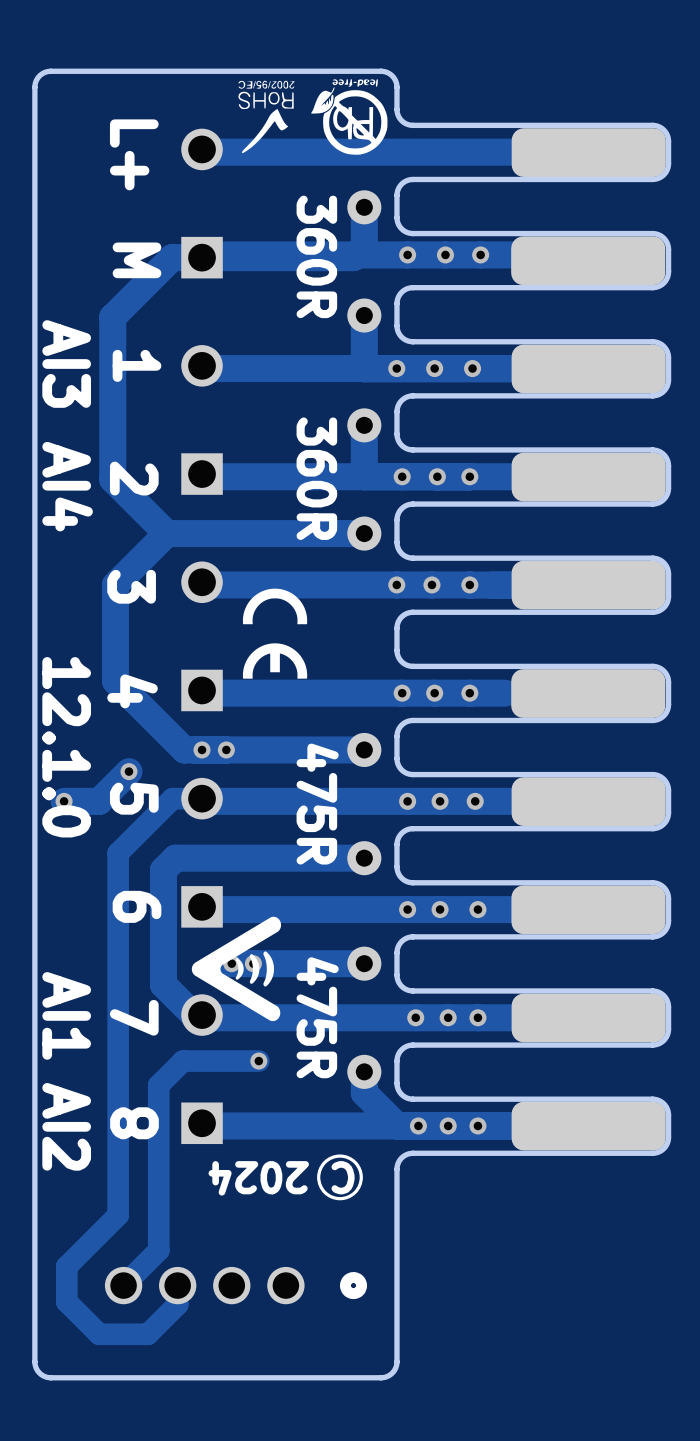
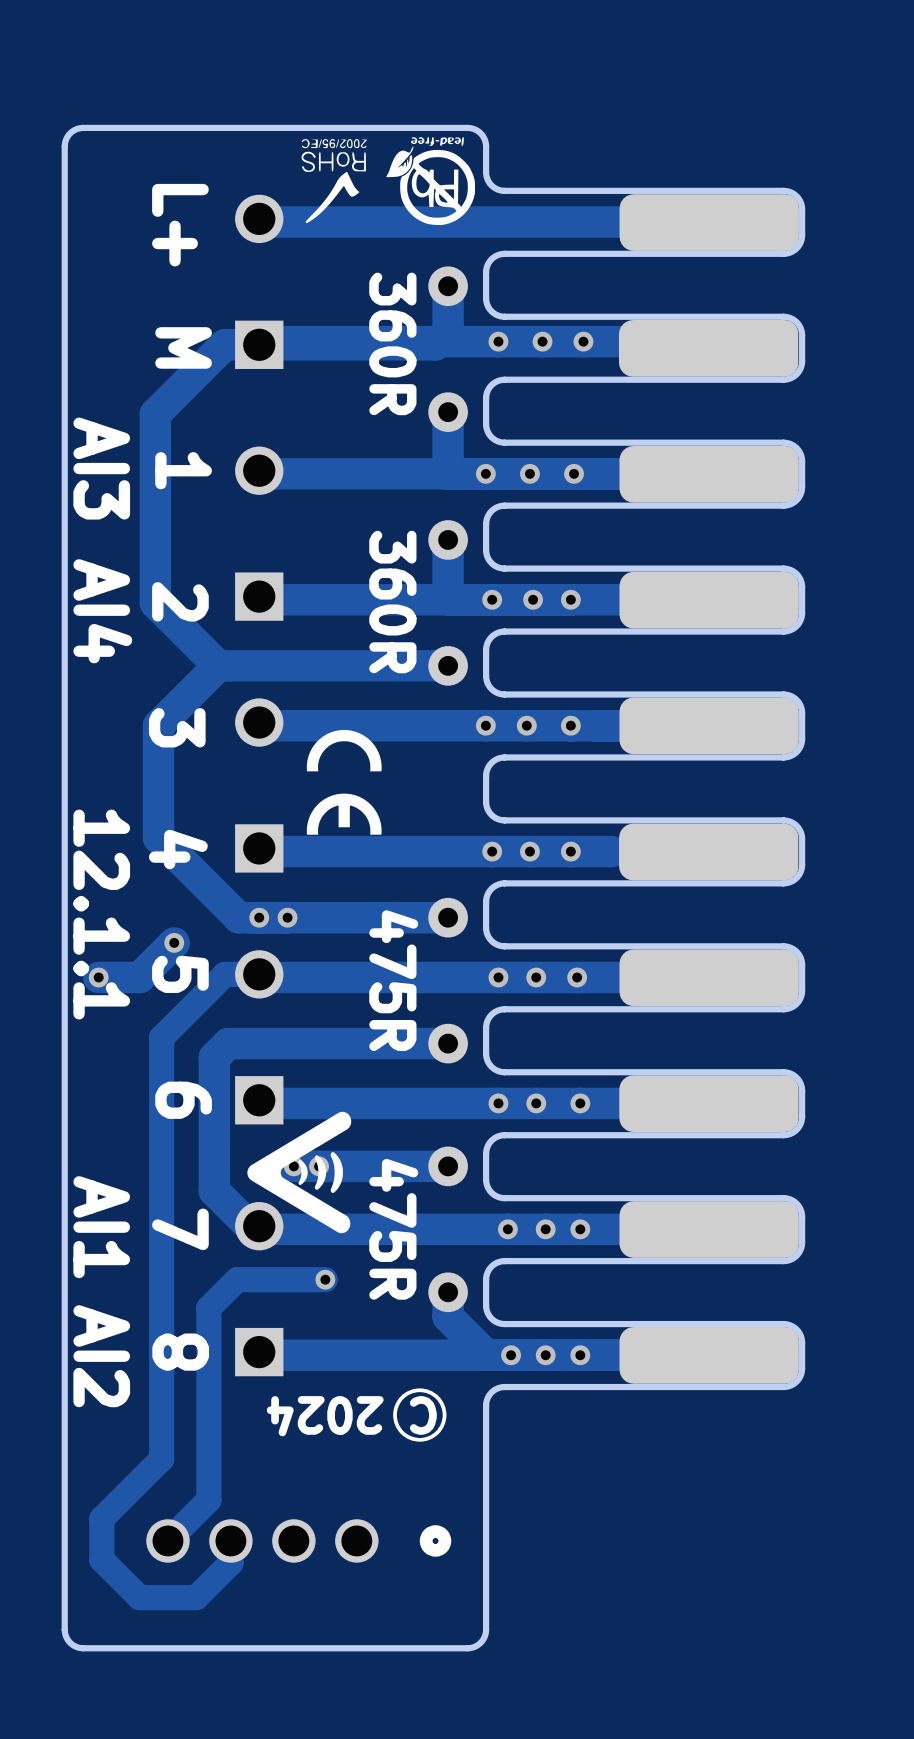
text: 12.1.0 (66, 747) -> 12.1.1 (101, 914)

